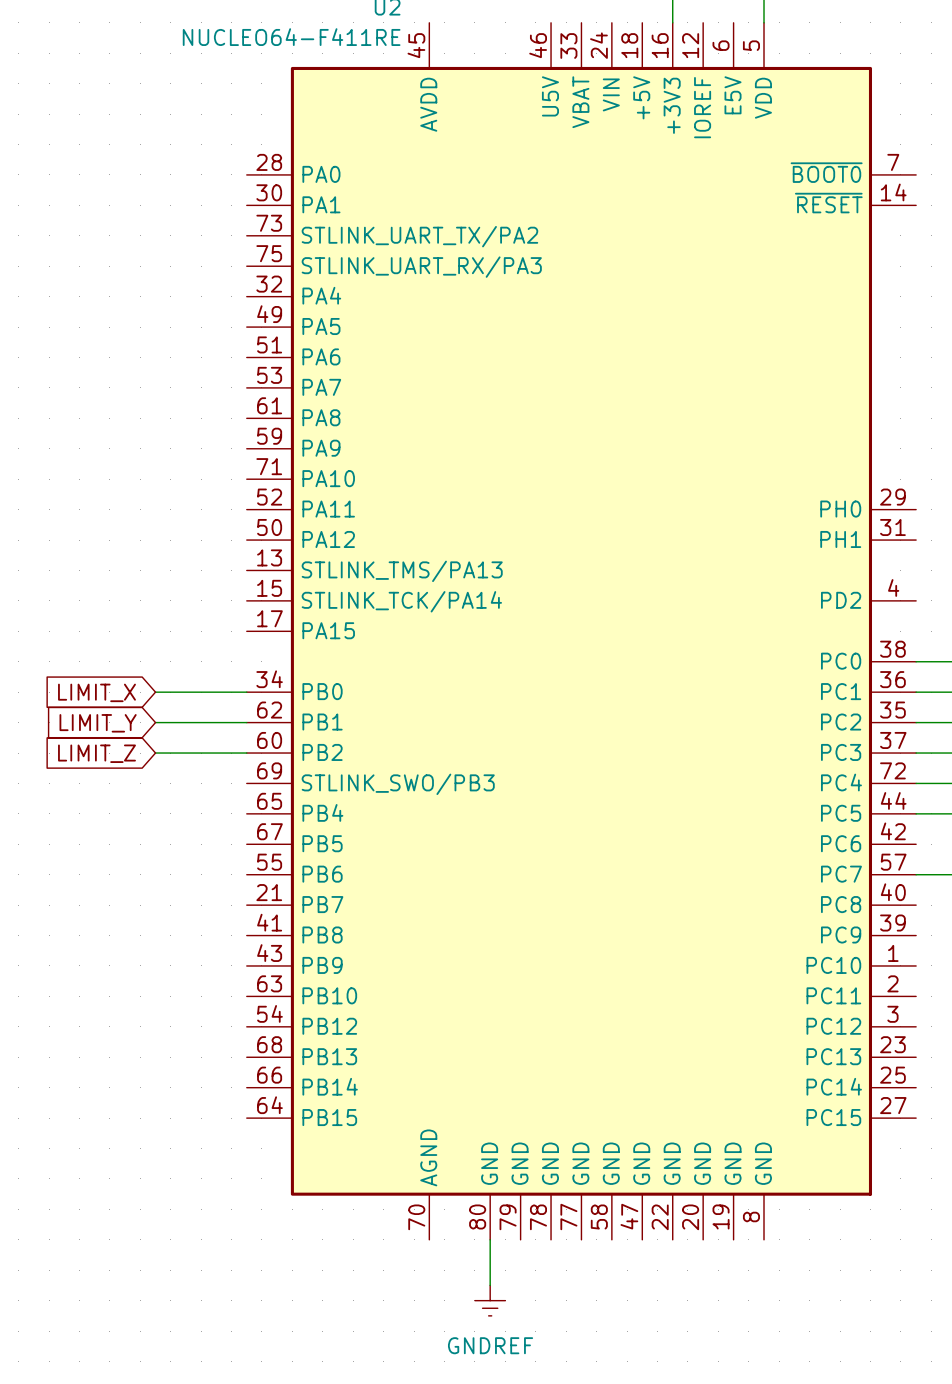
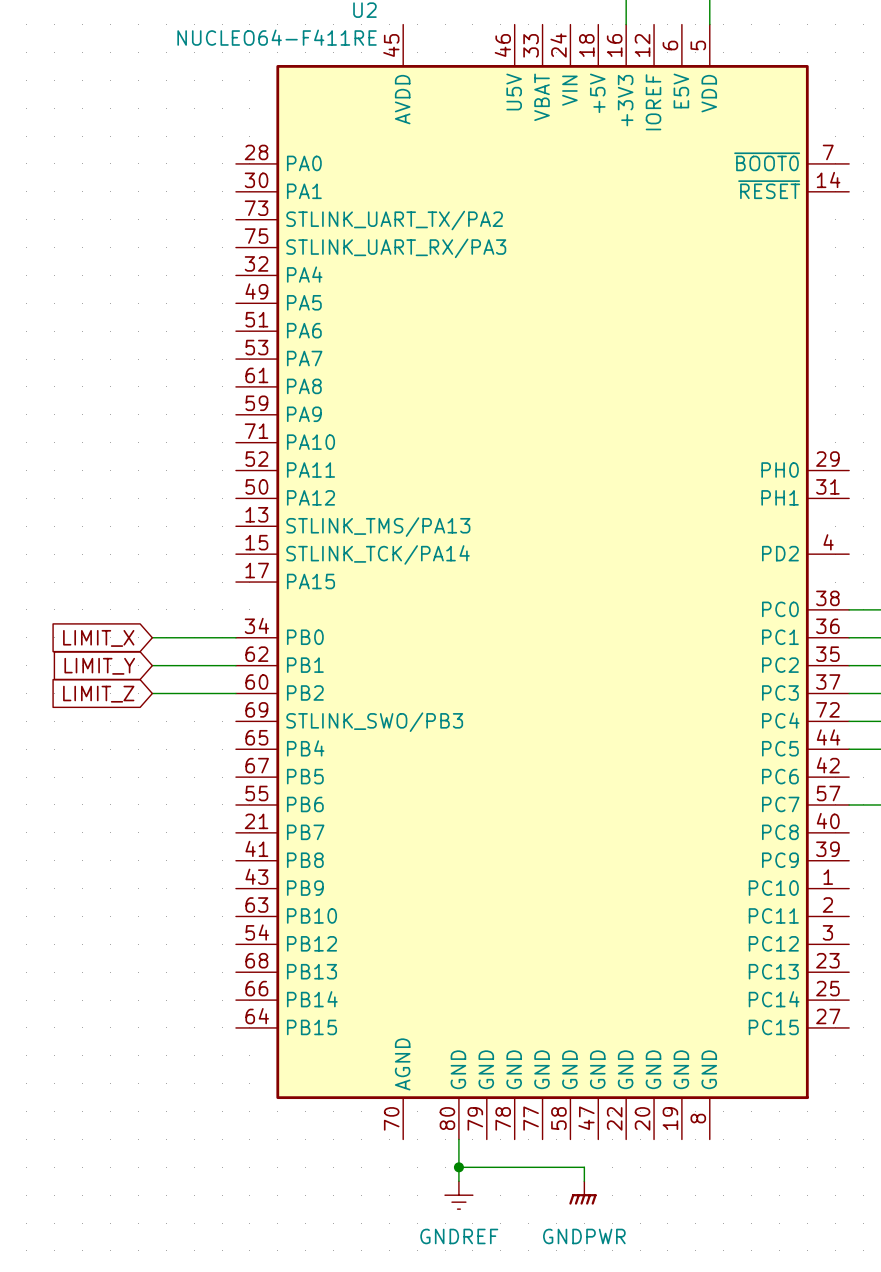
wire: none -> (458, 1167) (584, 1167) (584, 1181)
junction: none -> (458, 1167)
power symbol: none -> GNDPWR (582, 1192)

